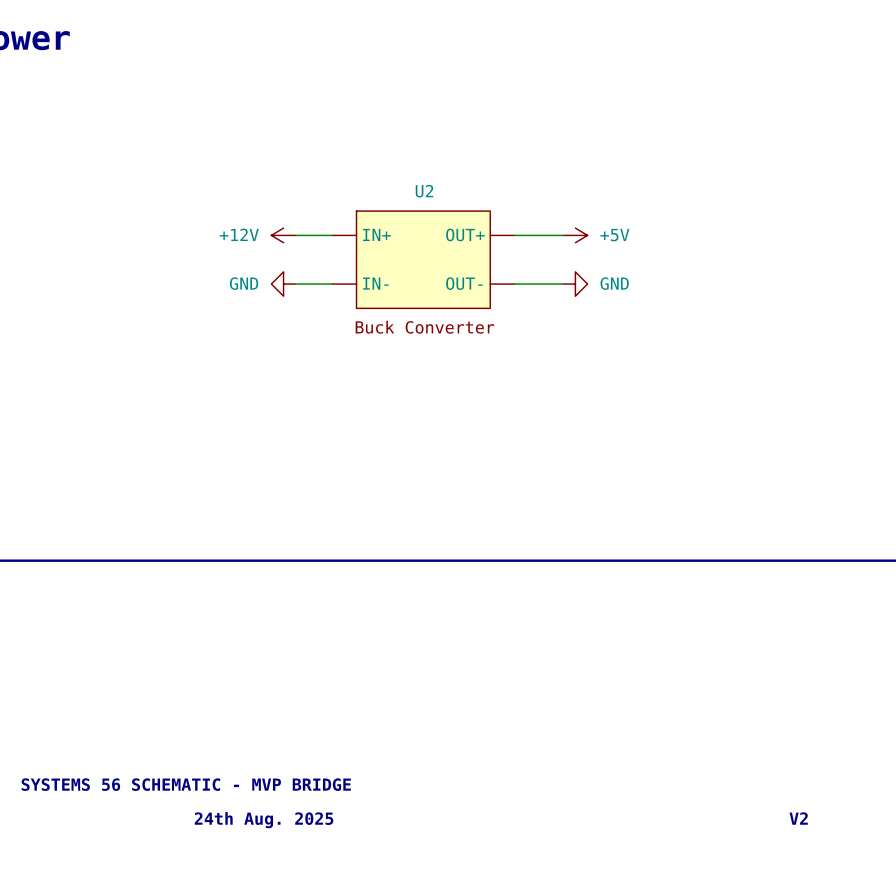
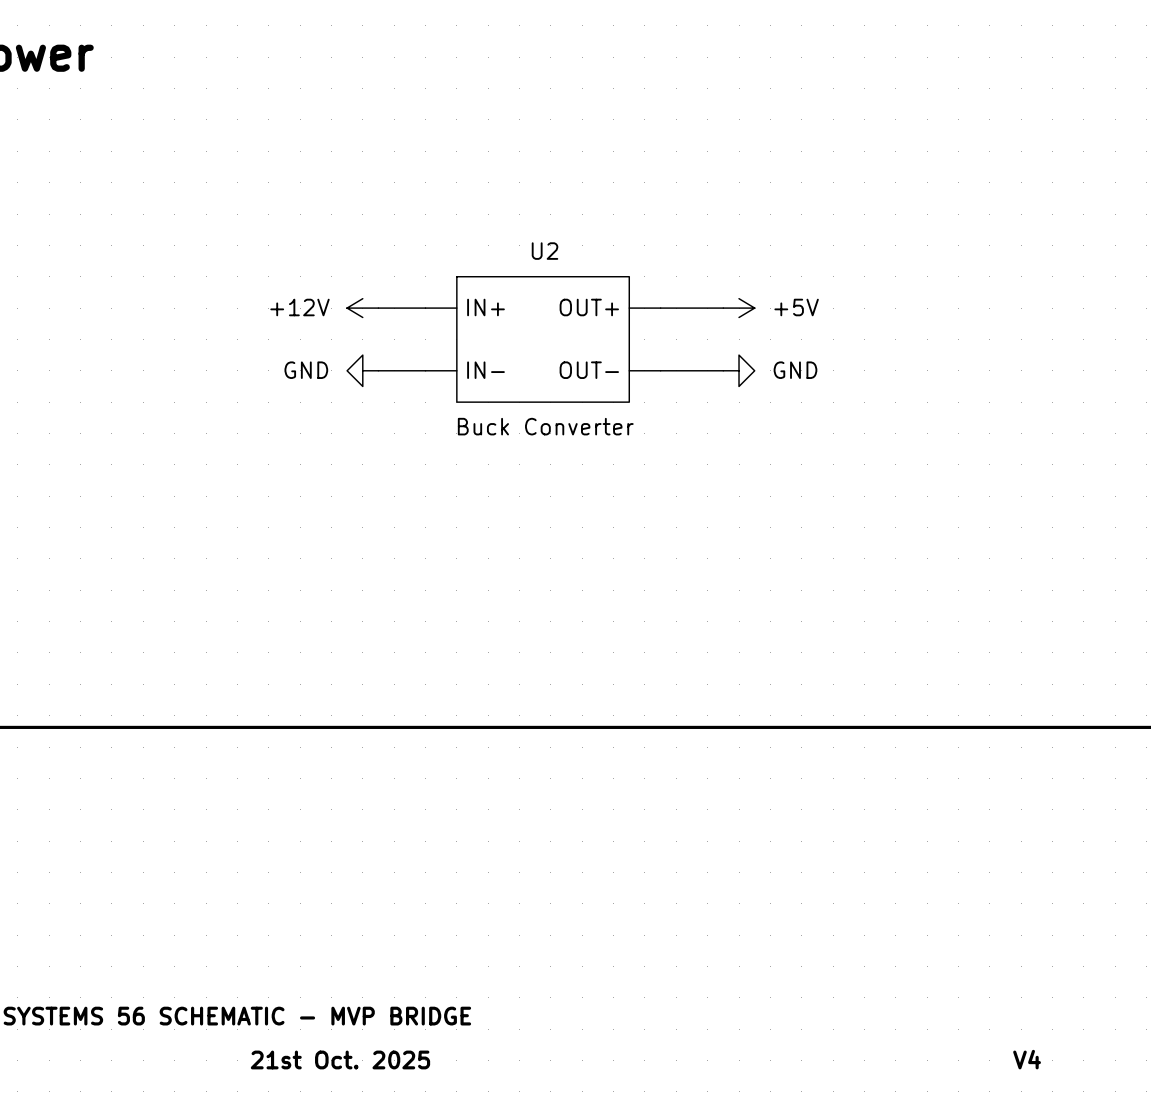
text: V2 (798, 818) -> V4 (1027, 1059)
text: 24th Aug. 2025 (264, 820) -> 21st Oct. 2025 (340, 1059)

